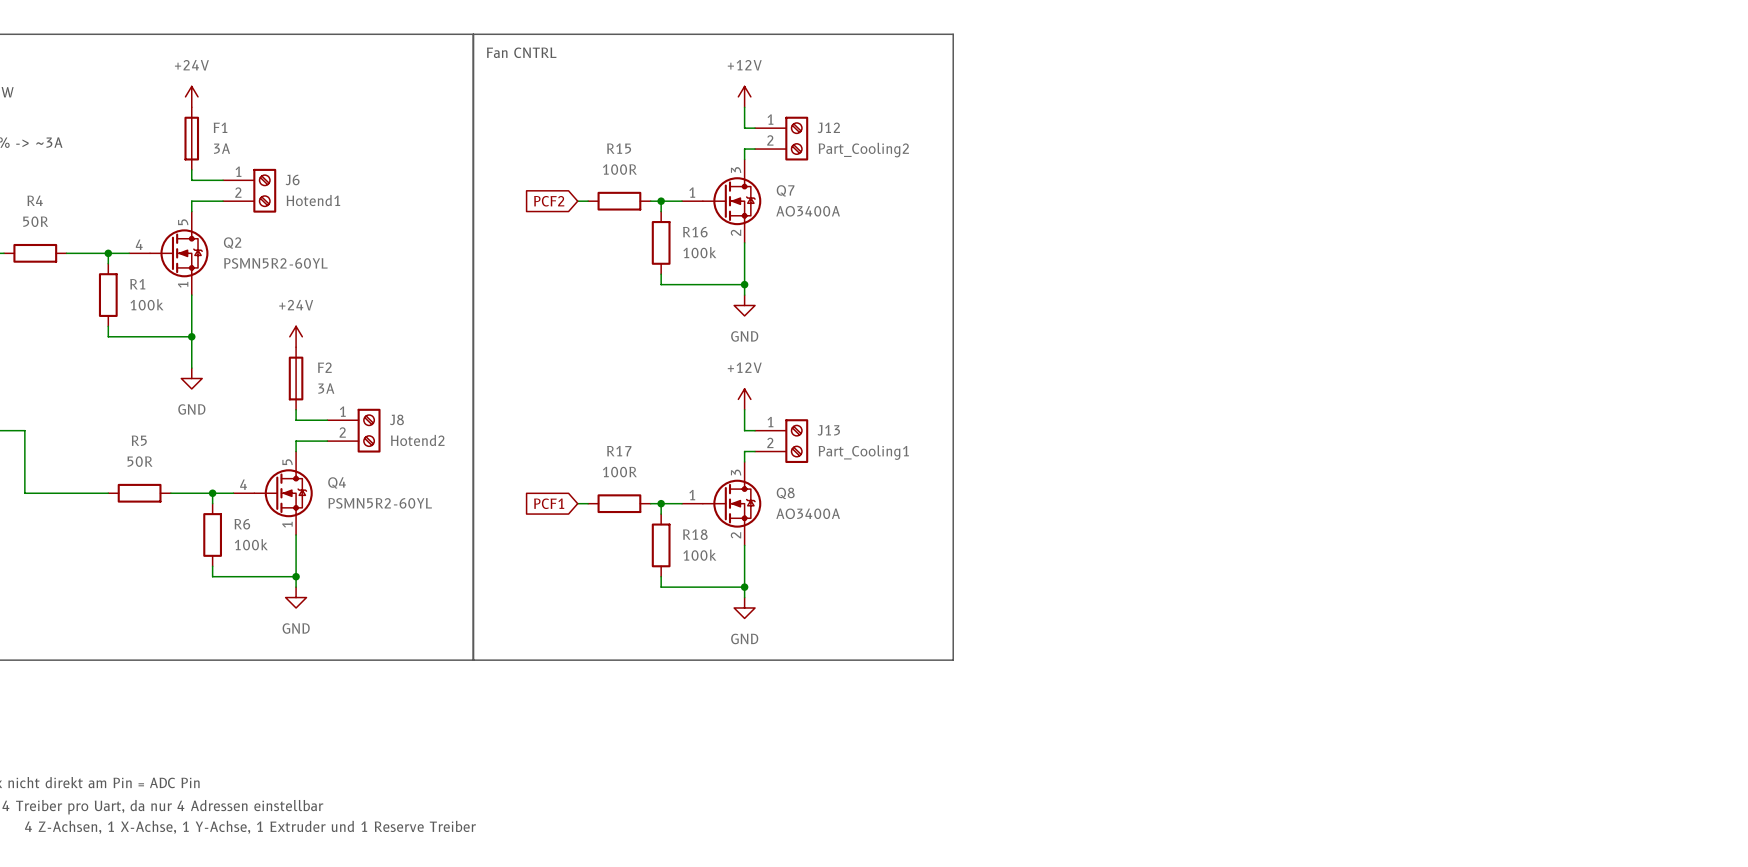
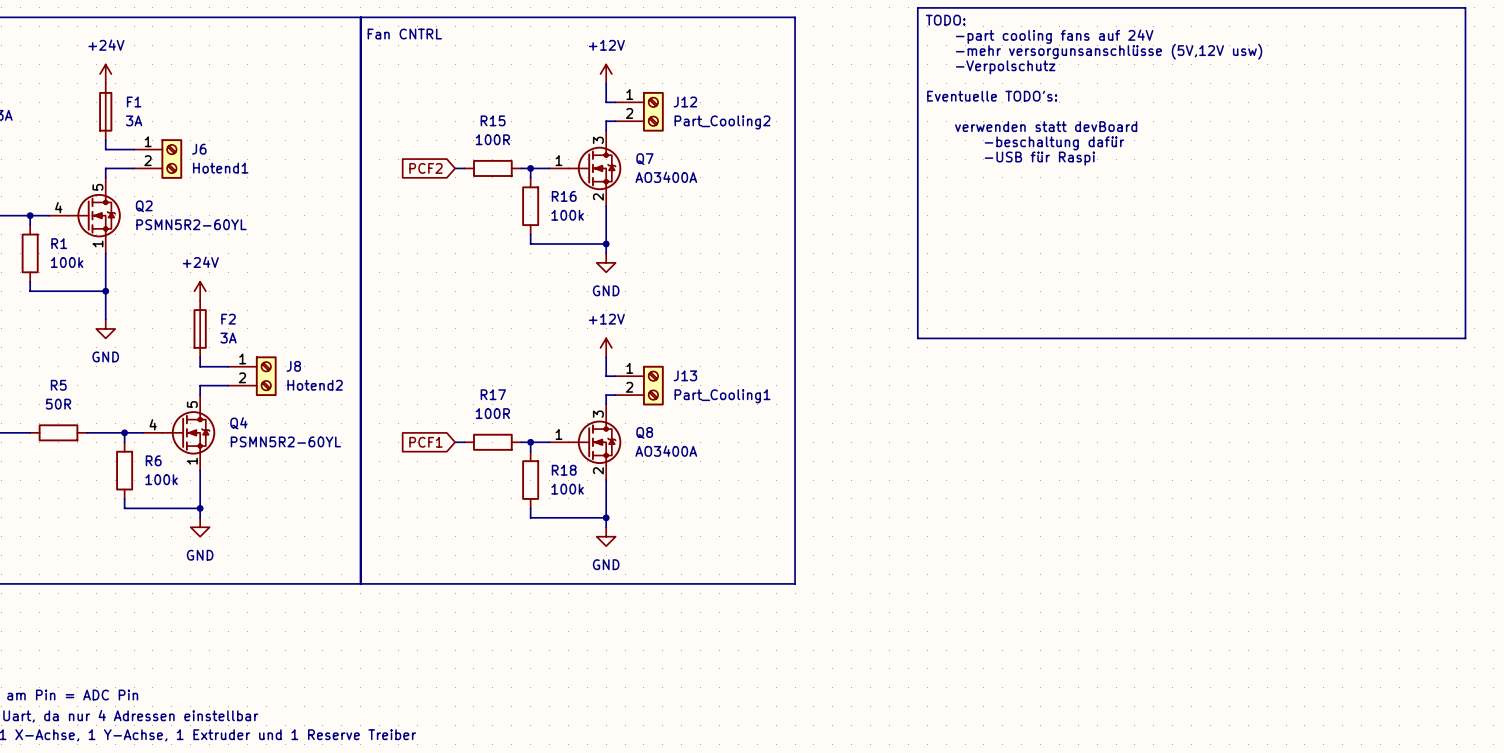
line: none -> (917, 7) (1465, 7) (1465, 338) (917, 338) (917, 7)
text: none -> TODO: (945, 20)
text: none -> -part cooling fans auf 24V (1054, 36)
text: none -> -mehr versorgunsanschlüsse (5V,12V usw) (1109, 51)
text: none -> -Verpolschutz (1005, 67)
text: none -> Eventuelle TODO's: (992, 96)
text: none -> verwenden statt devBoard (1046, 126)
text: none -> -beschaltung dafür (1054, 143)
text: none -> -USB für Raspi (1039, 158)

